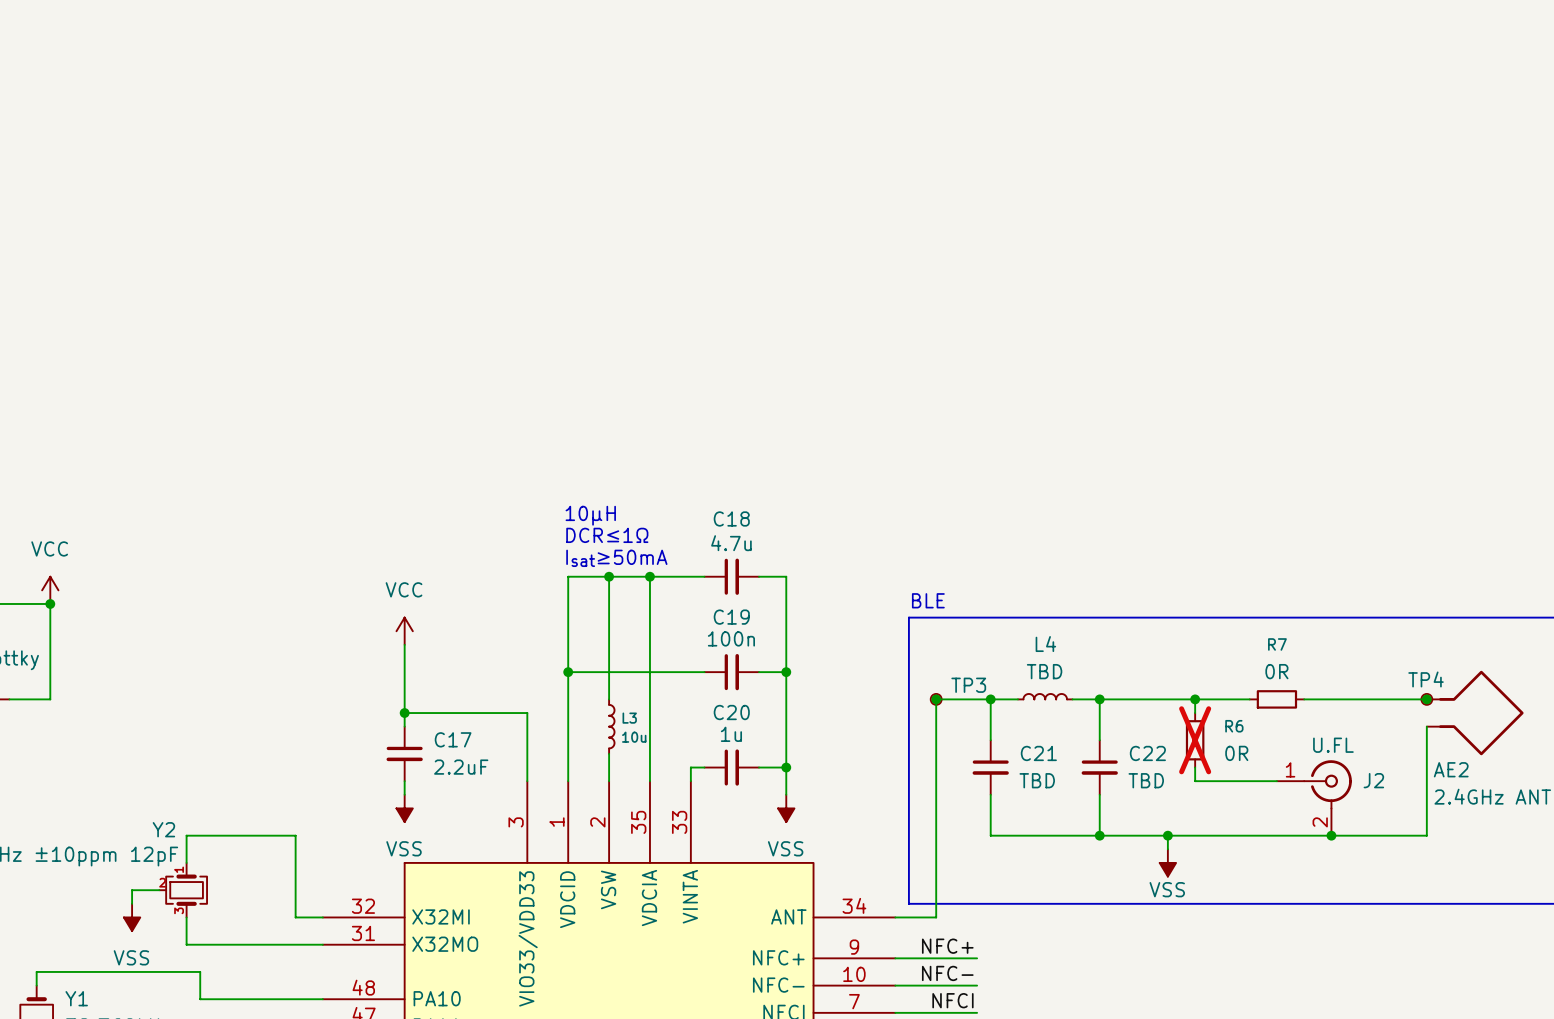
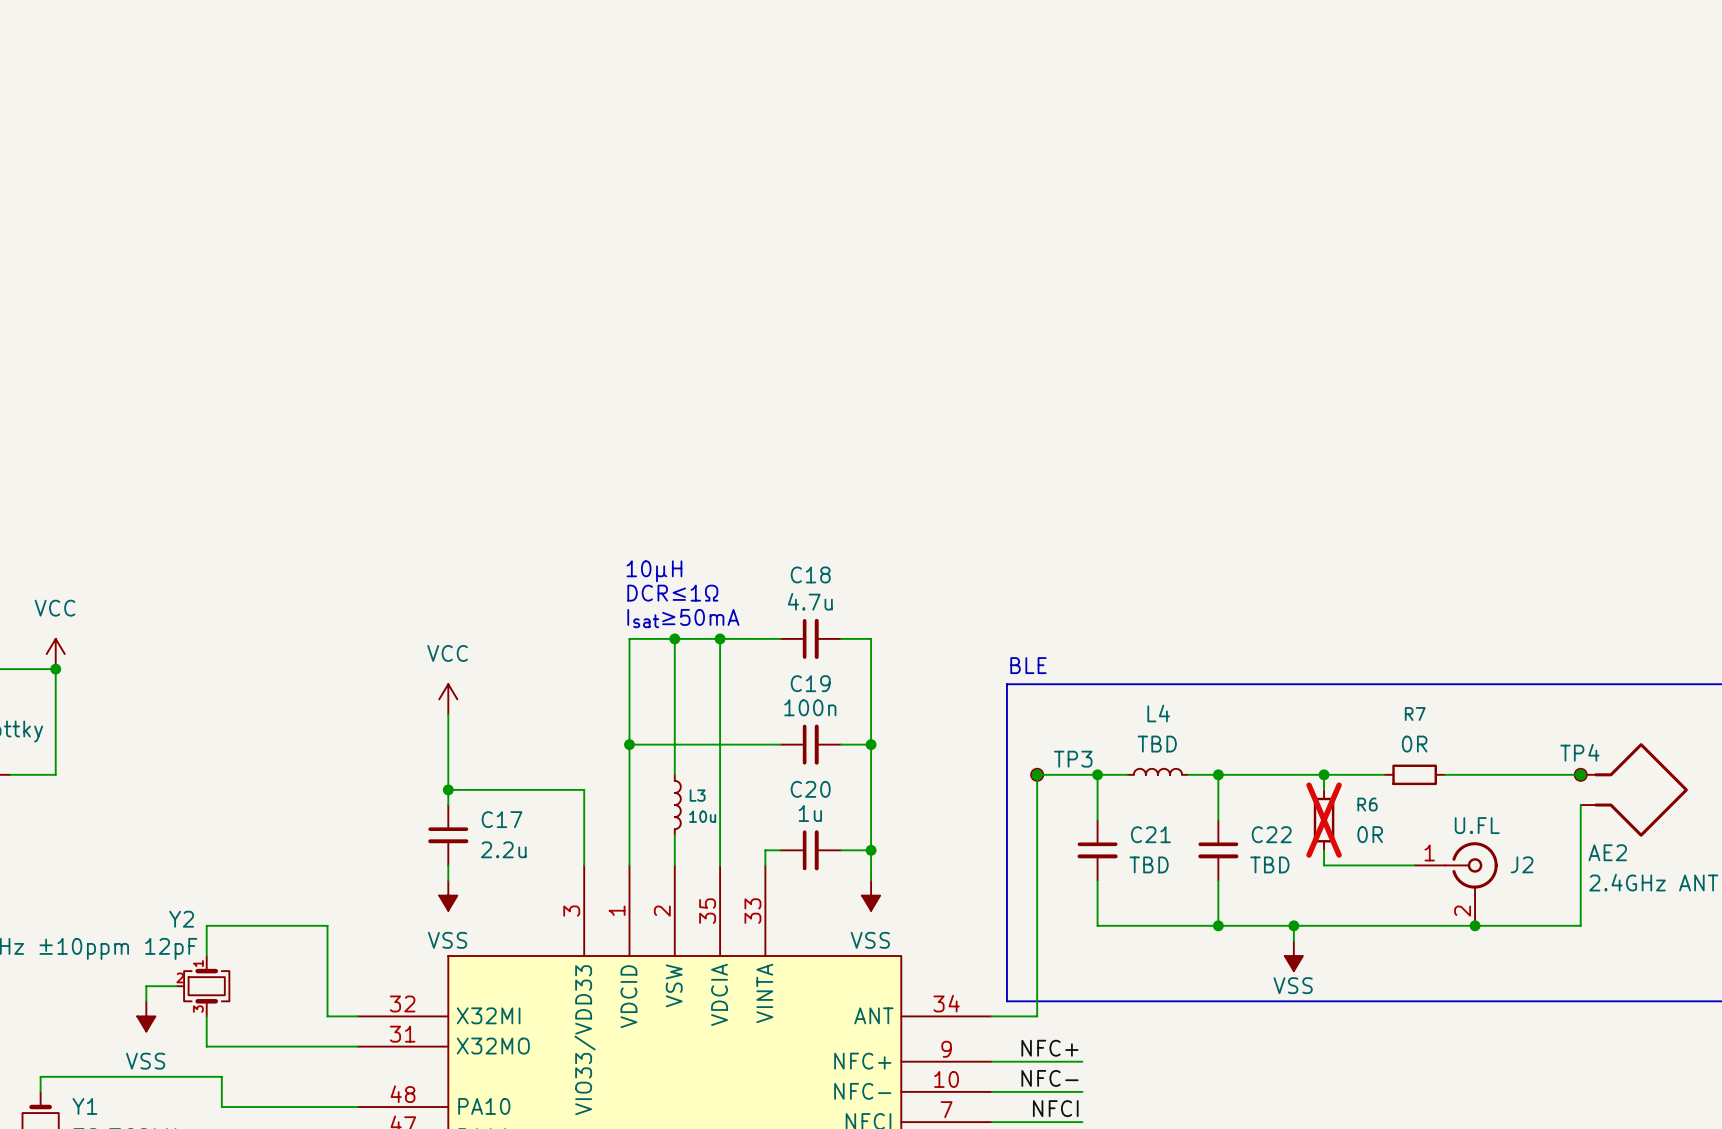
C17 value: 2.2uF (461, 767) -> 2.2u (503, 849)

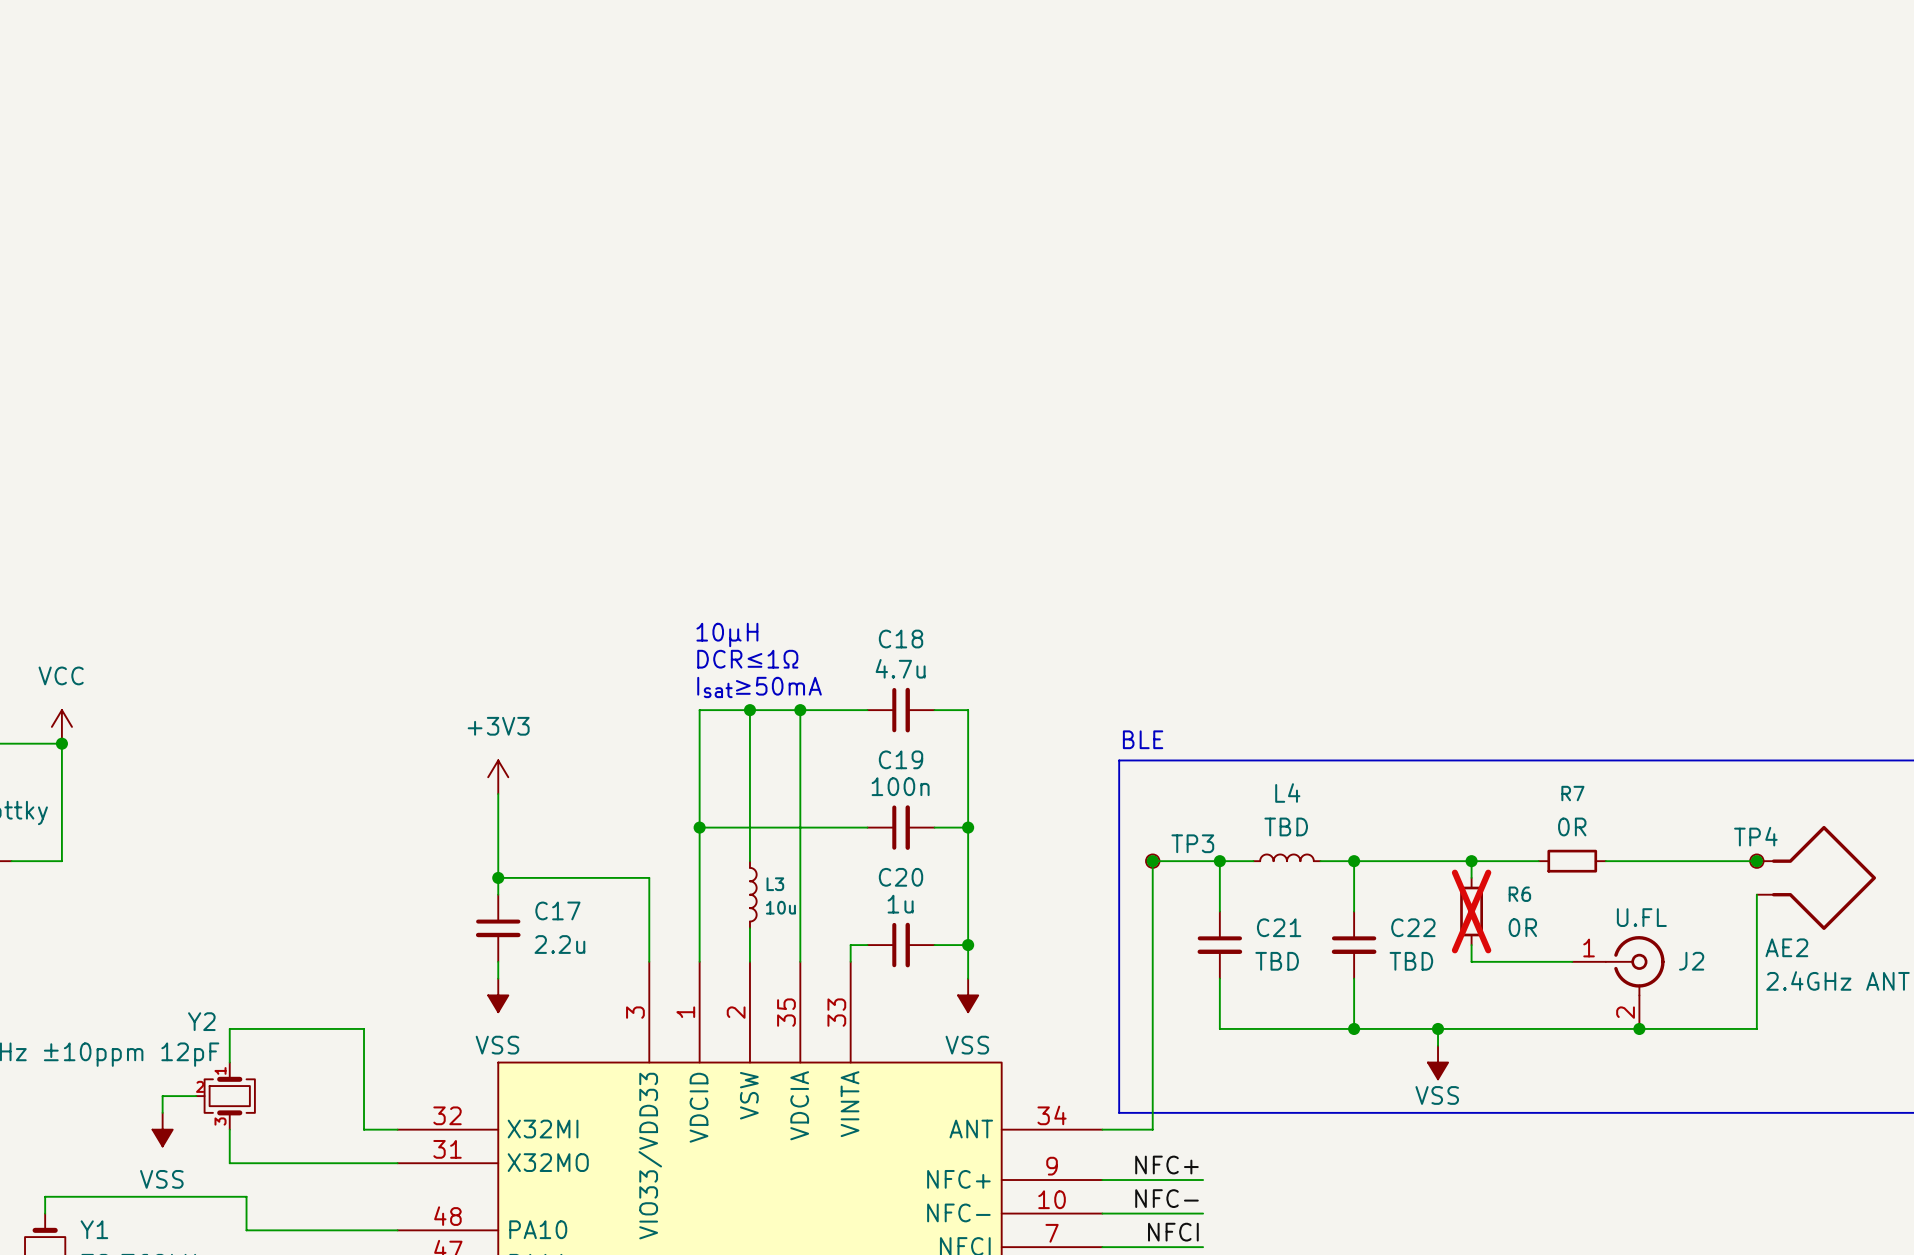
power symbol: VCC (448, 699) -> +3V3 (498, 777)

